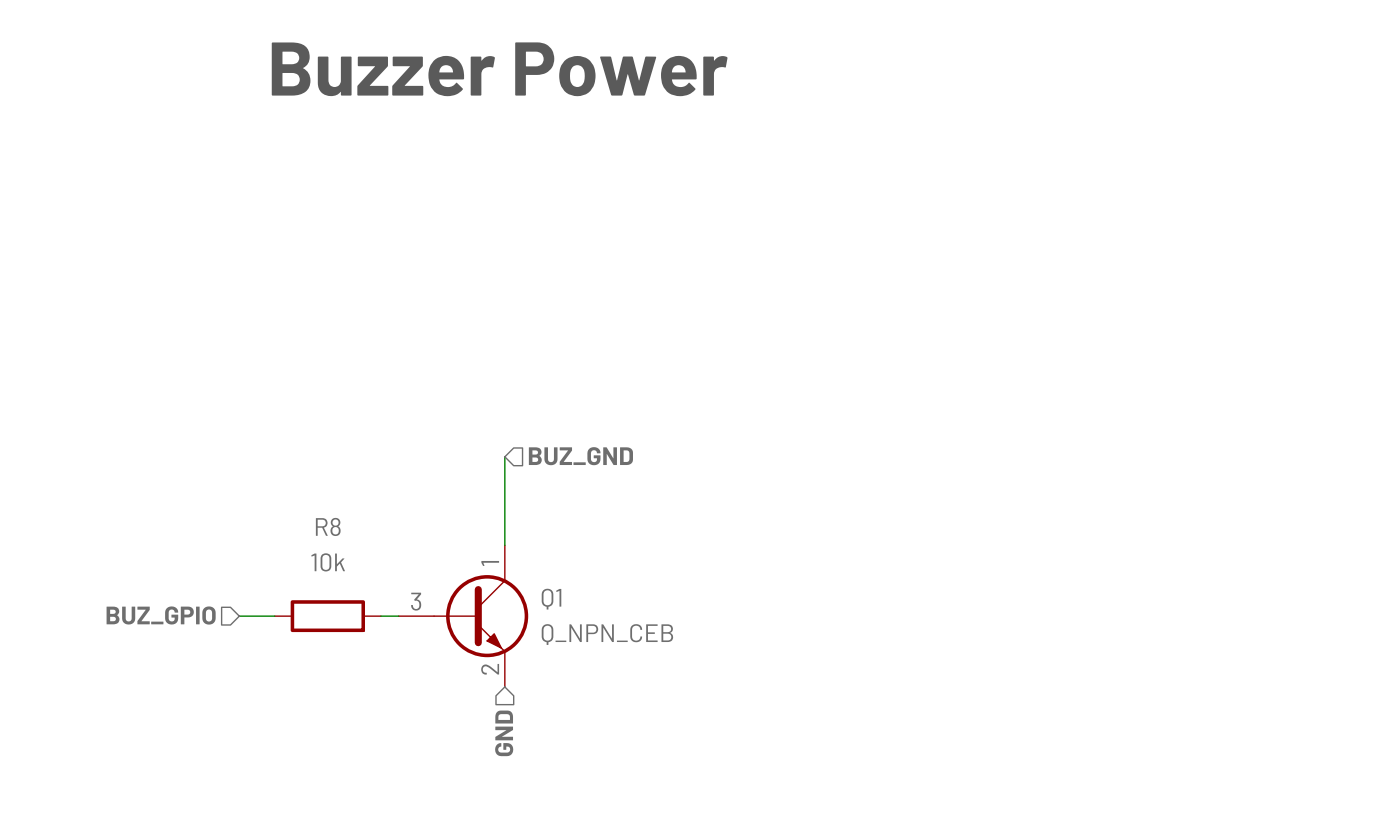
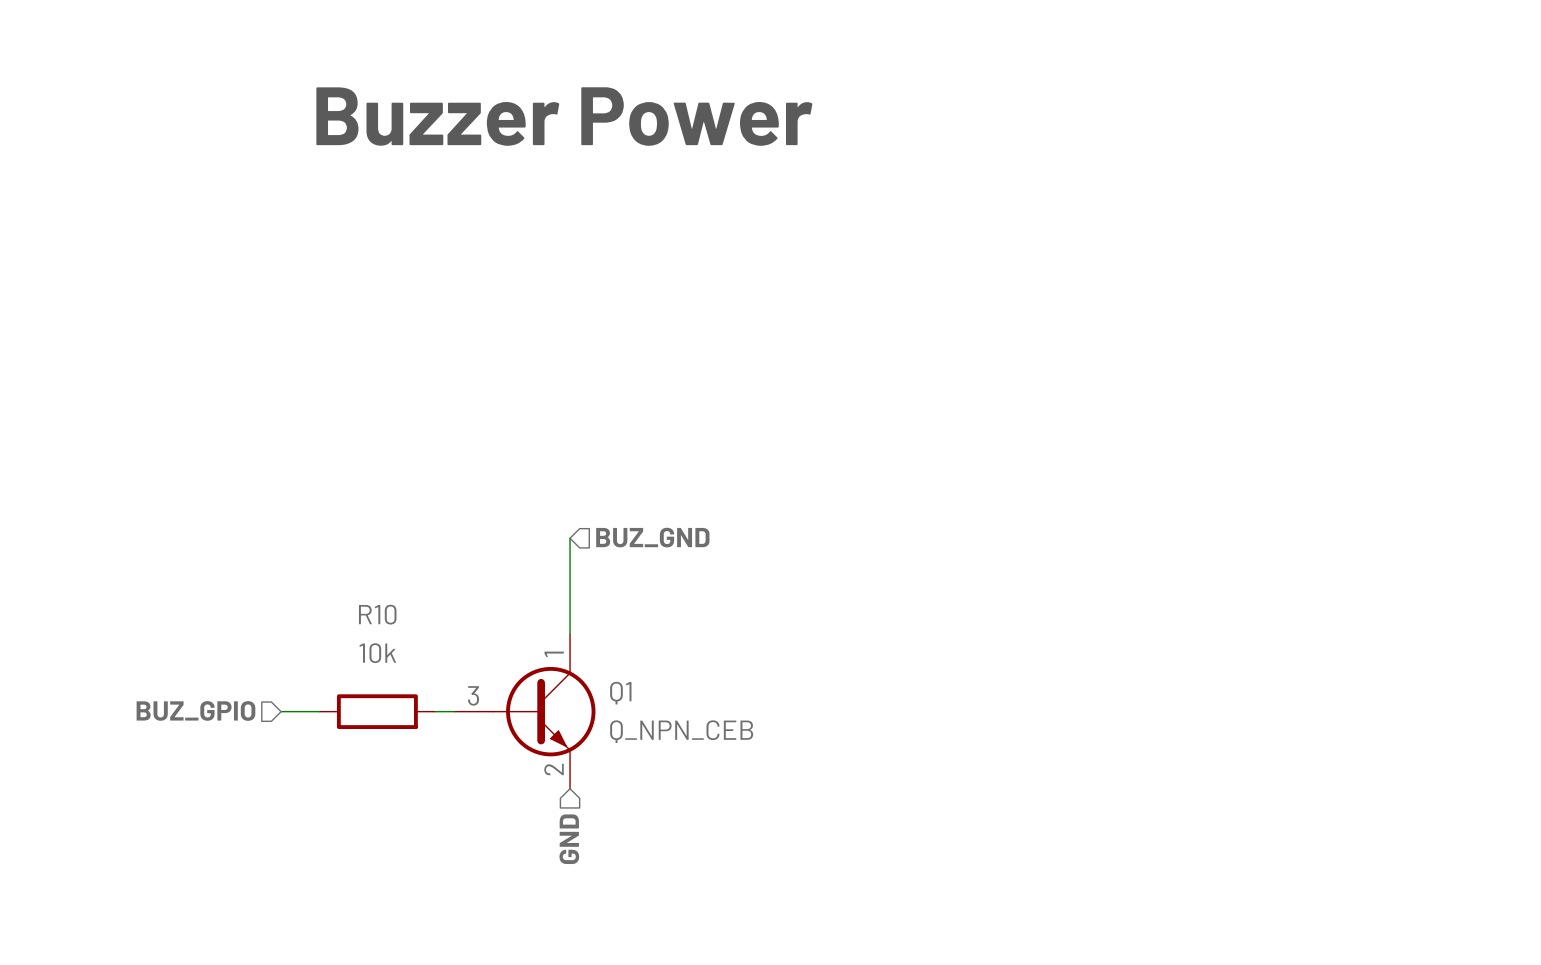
R8 name: R8 (328, 526) -> R10 (377, 614)

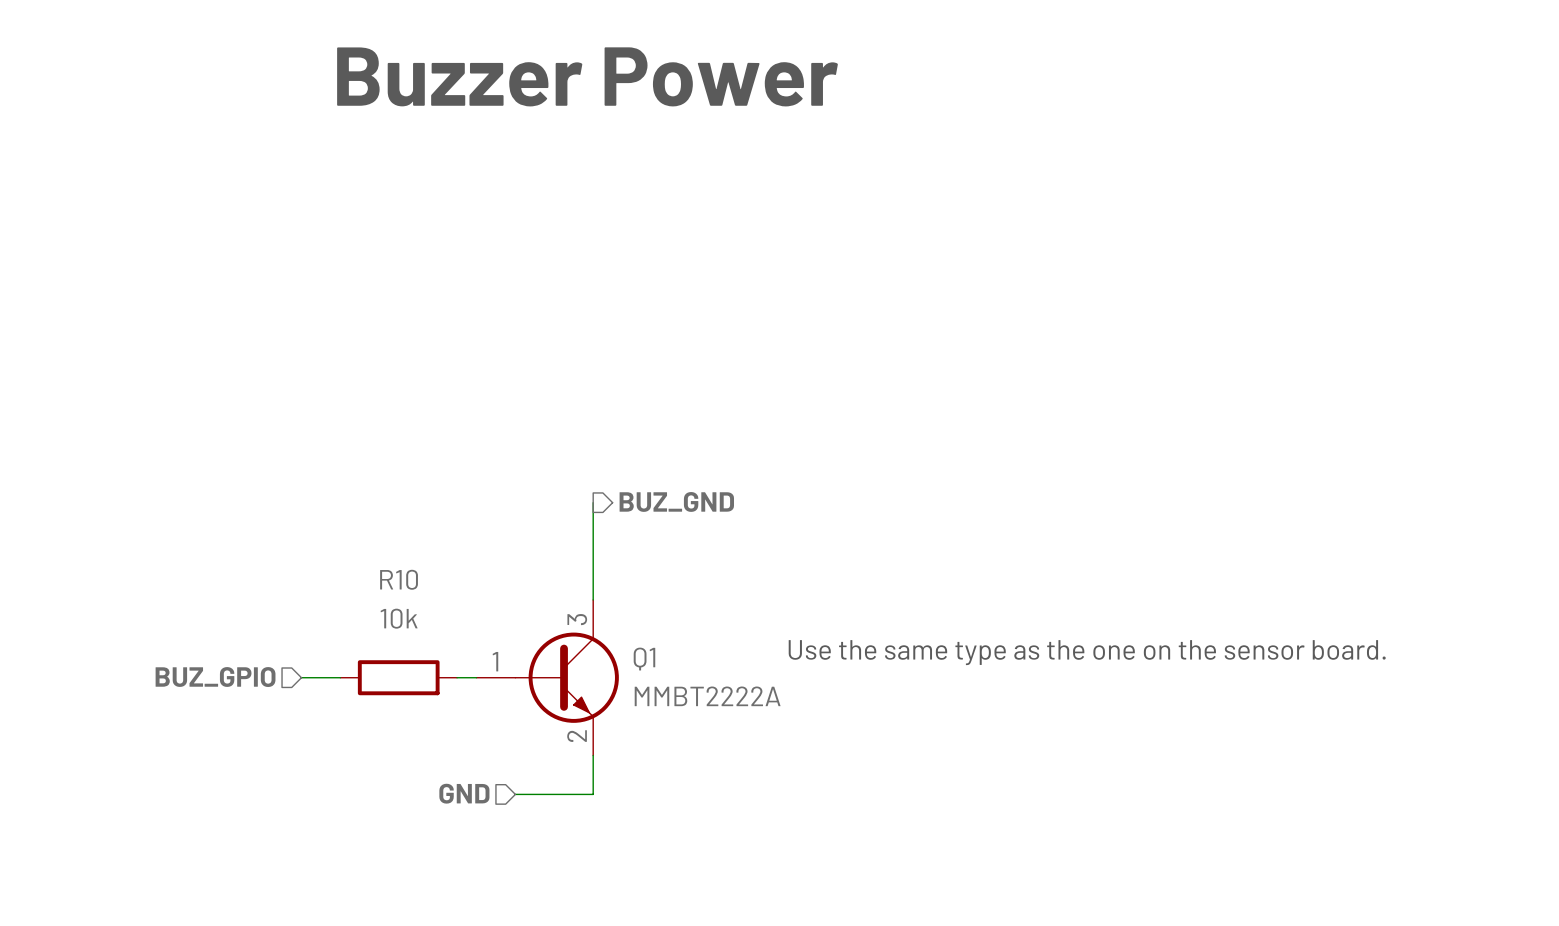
hierarchical label shape: input (652, 537) -> output (676, 501)
Q1 pin number: 1 (554, 654) -> 3 (577, 619)
text: none -> Use the same type as the one on the sensor board. (1087, 652)
Q1 pin number: 3 (473, 695) -> 1 (495, 661)
Q1 value: Q_NPN_CEB (681, 731) -> MMBT2222A (707, 696)
wire: none -> (593, 755) (593, 794) (515, 794)
hierarchical label rotation: 0° (569, 839) -> 90° clockwise (464, 793)
hierarchical label position: GND (569, 839) -> GND (464, 793)

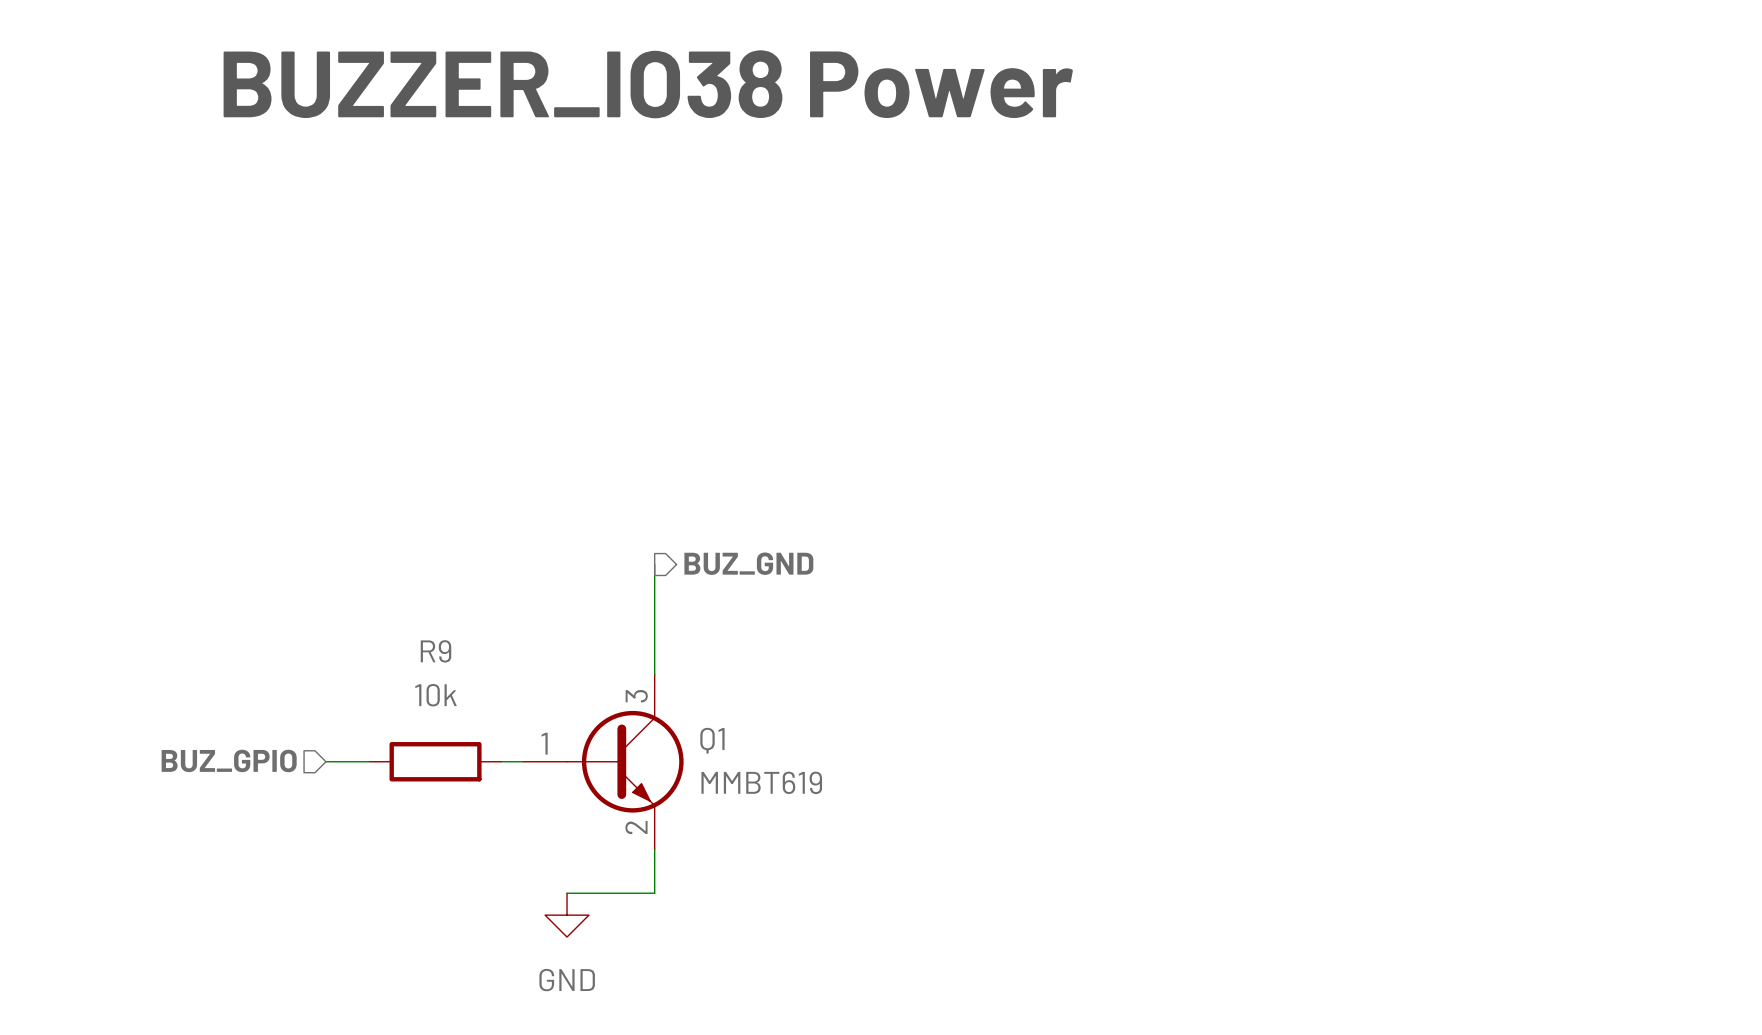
text: Buzzer Power (587, 76) -> BUZZER_IO38 Power (648, 84)
R10 name: R10 (399, 579) -> R9 (435, 651)
text: Use the same type as the one on the sensor board. (1087, 652) -> none
Q1 value: MMBT2222A (707, 696) -> MMBT619 (761, 782)
hierarchical label: GND (464, 793) -> none
power symbol: none -> GND (567, 915)

